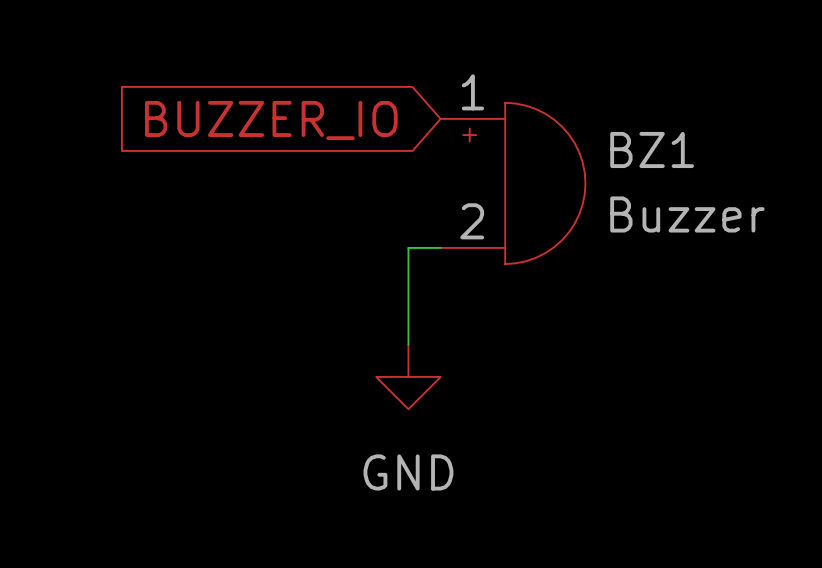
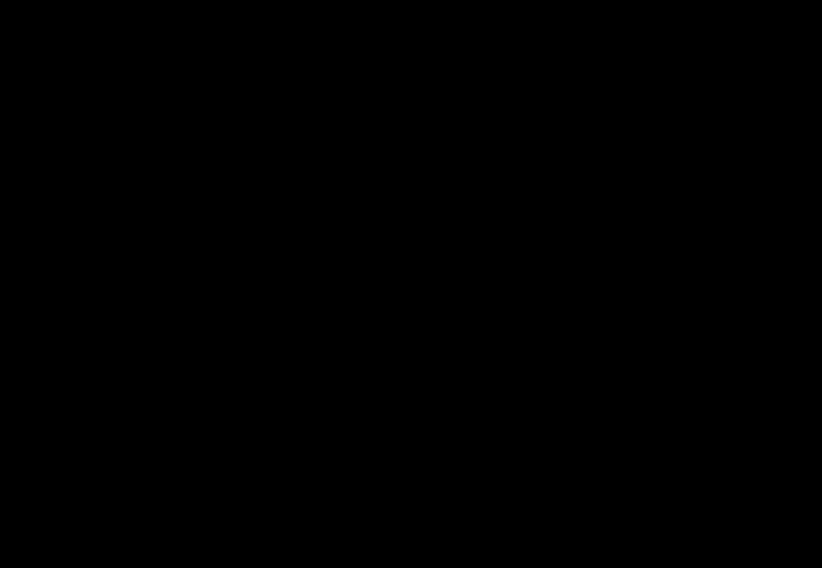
global label: BUZZER_IO (271, 120) -> none
BZ1: Buzzer (513, 183) -> none
wire: (440, 247) (408, 247) (408, 344) -> none
power symbol: GND (408, 376) -> none

